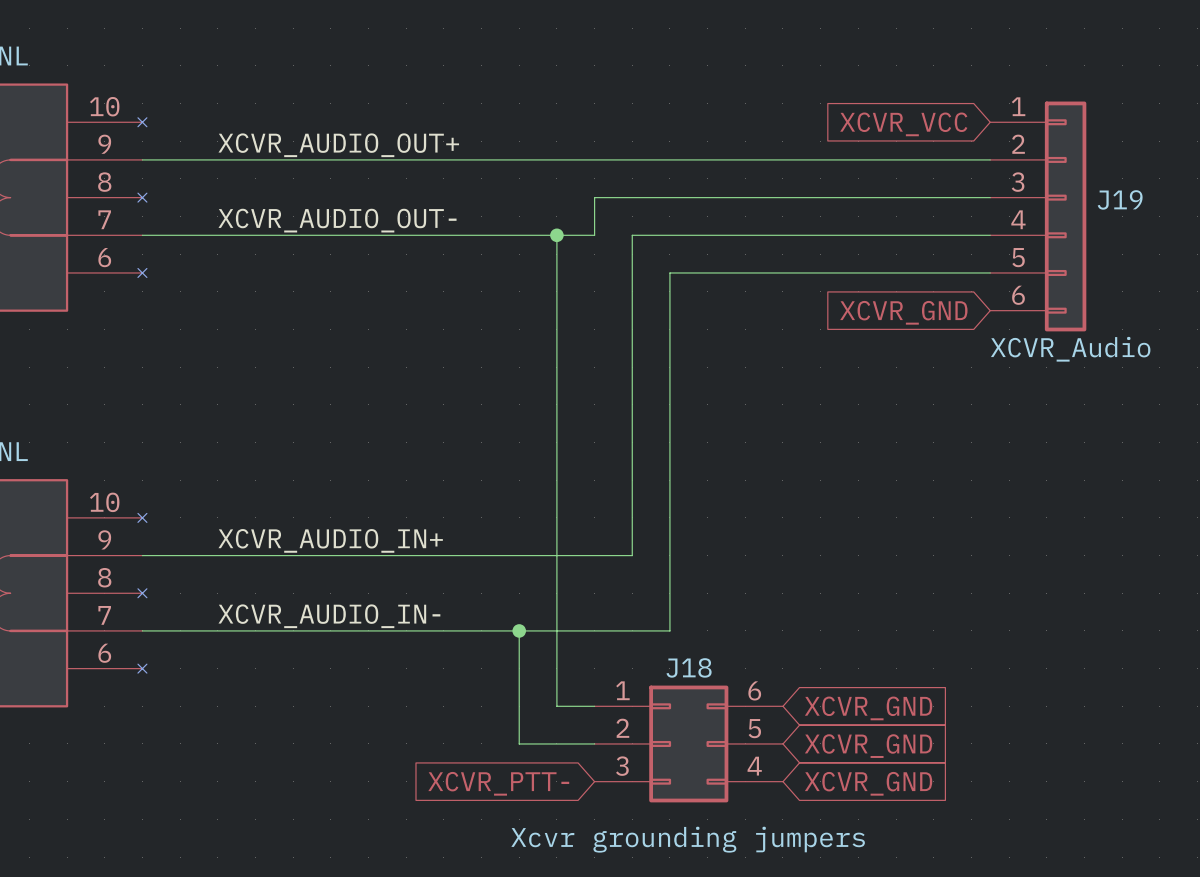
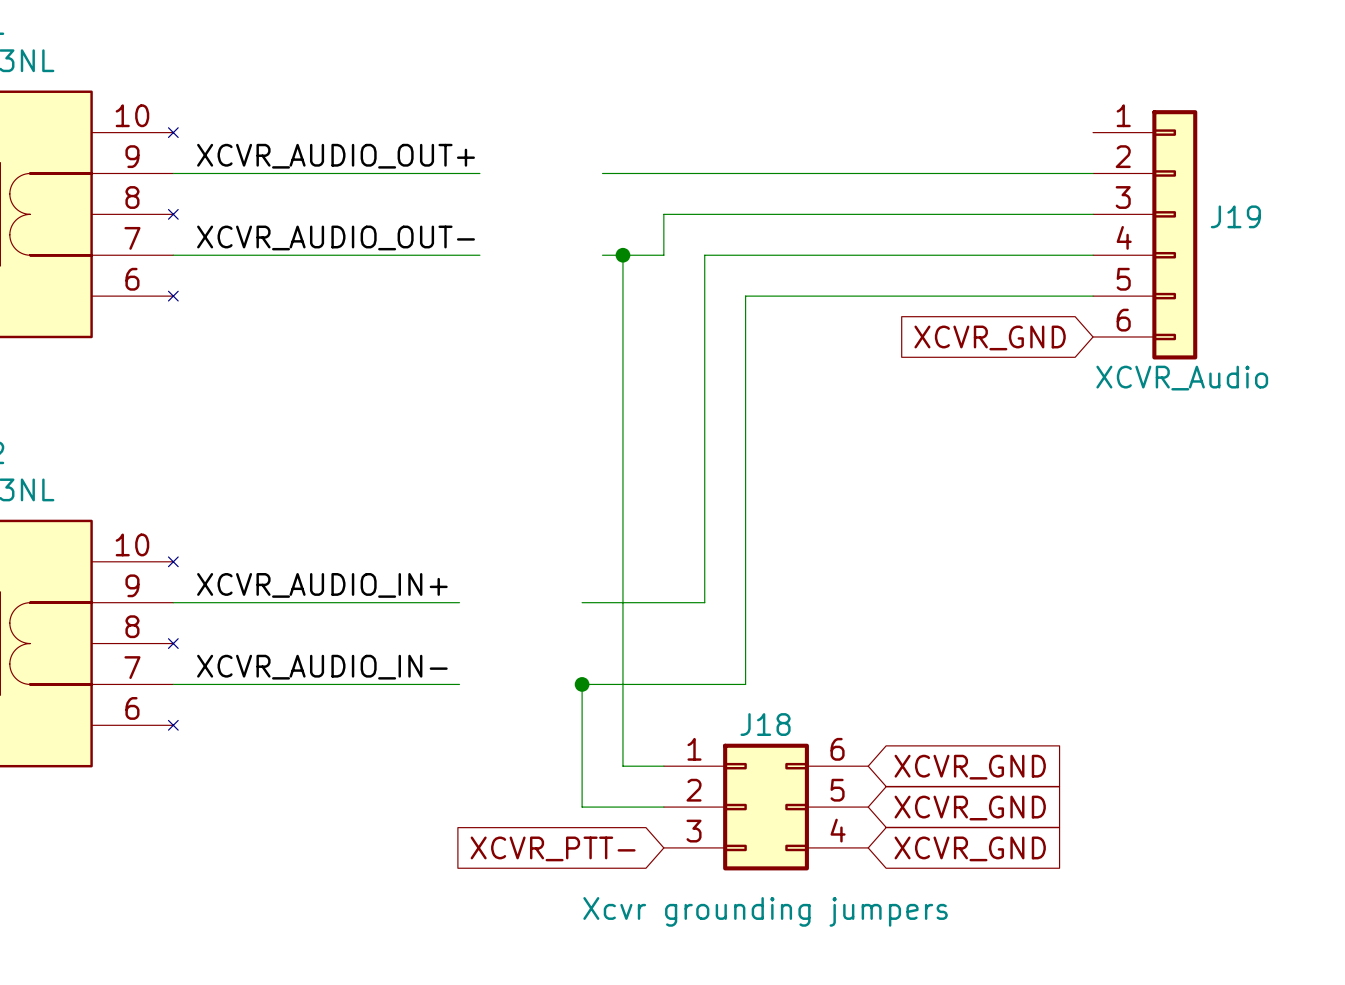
global label: XCVR_VCC (903, 124) -> none
label position: XCVR_AUDIO_OUT+ (338, 145) -> XCVR_AUDIO_OUT+ (336, 156)
wire: (425, 159) (538, 159) -> none
label position: XCVR_AUDIO_OUT- (337, 220) -> XCVR_AUDIO_OUT- (336, 237)
wire: (425, 235) (538, 235) -> none
label position: XCVR_AUDIO_IN+ (330, 540) -> XCVR_AUDIO_IN+ (322, 585)
wire: (406, 555) (519, 555) -> none
label position: XCVR_AUDIO_IN- (329, 616) -> XCVR_AUDIO_IN- (322, 667)
wire: (406, 630) (519, 630) -> none

